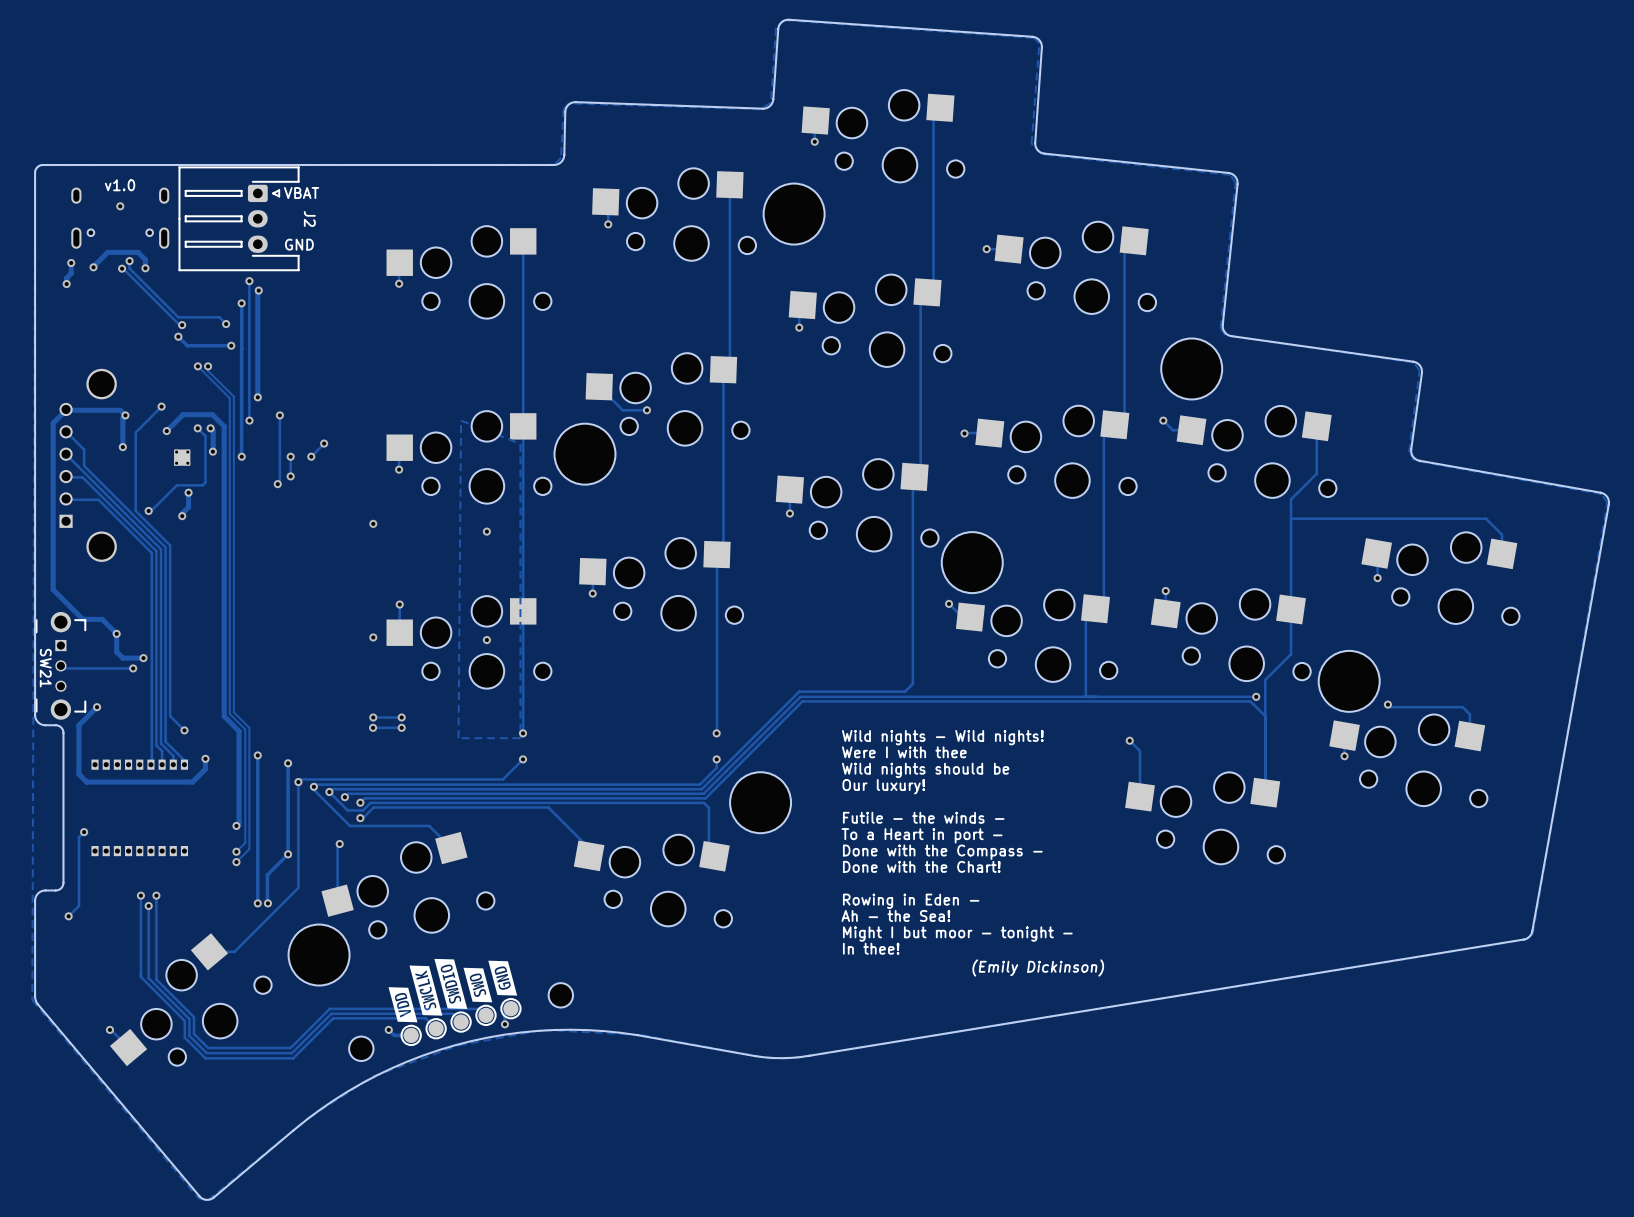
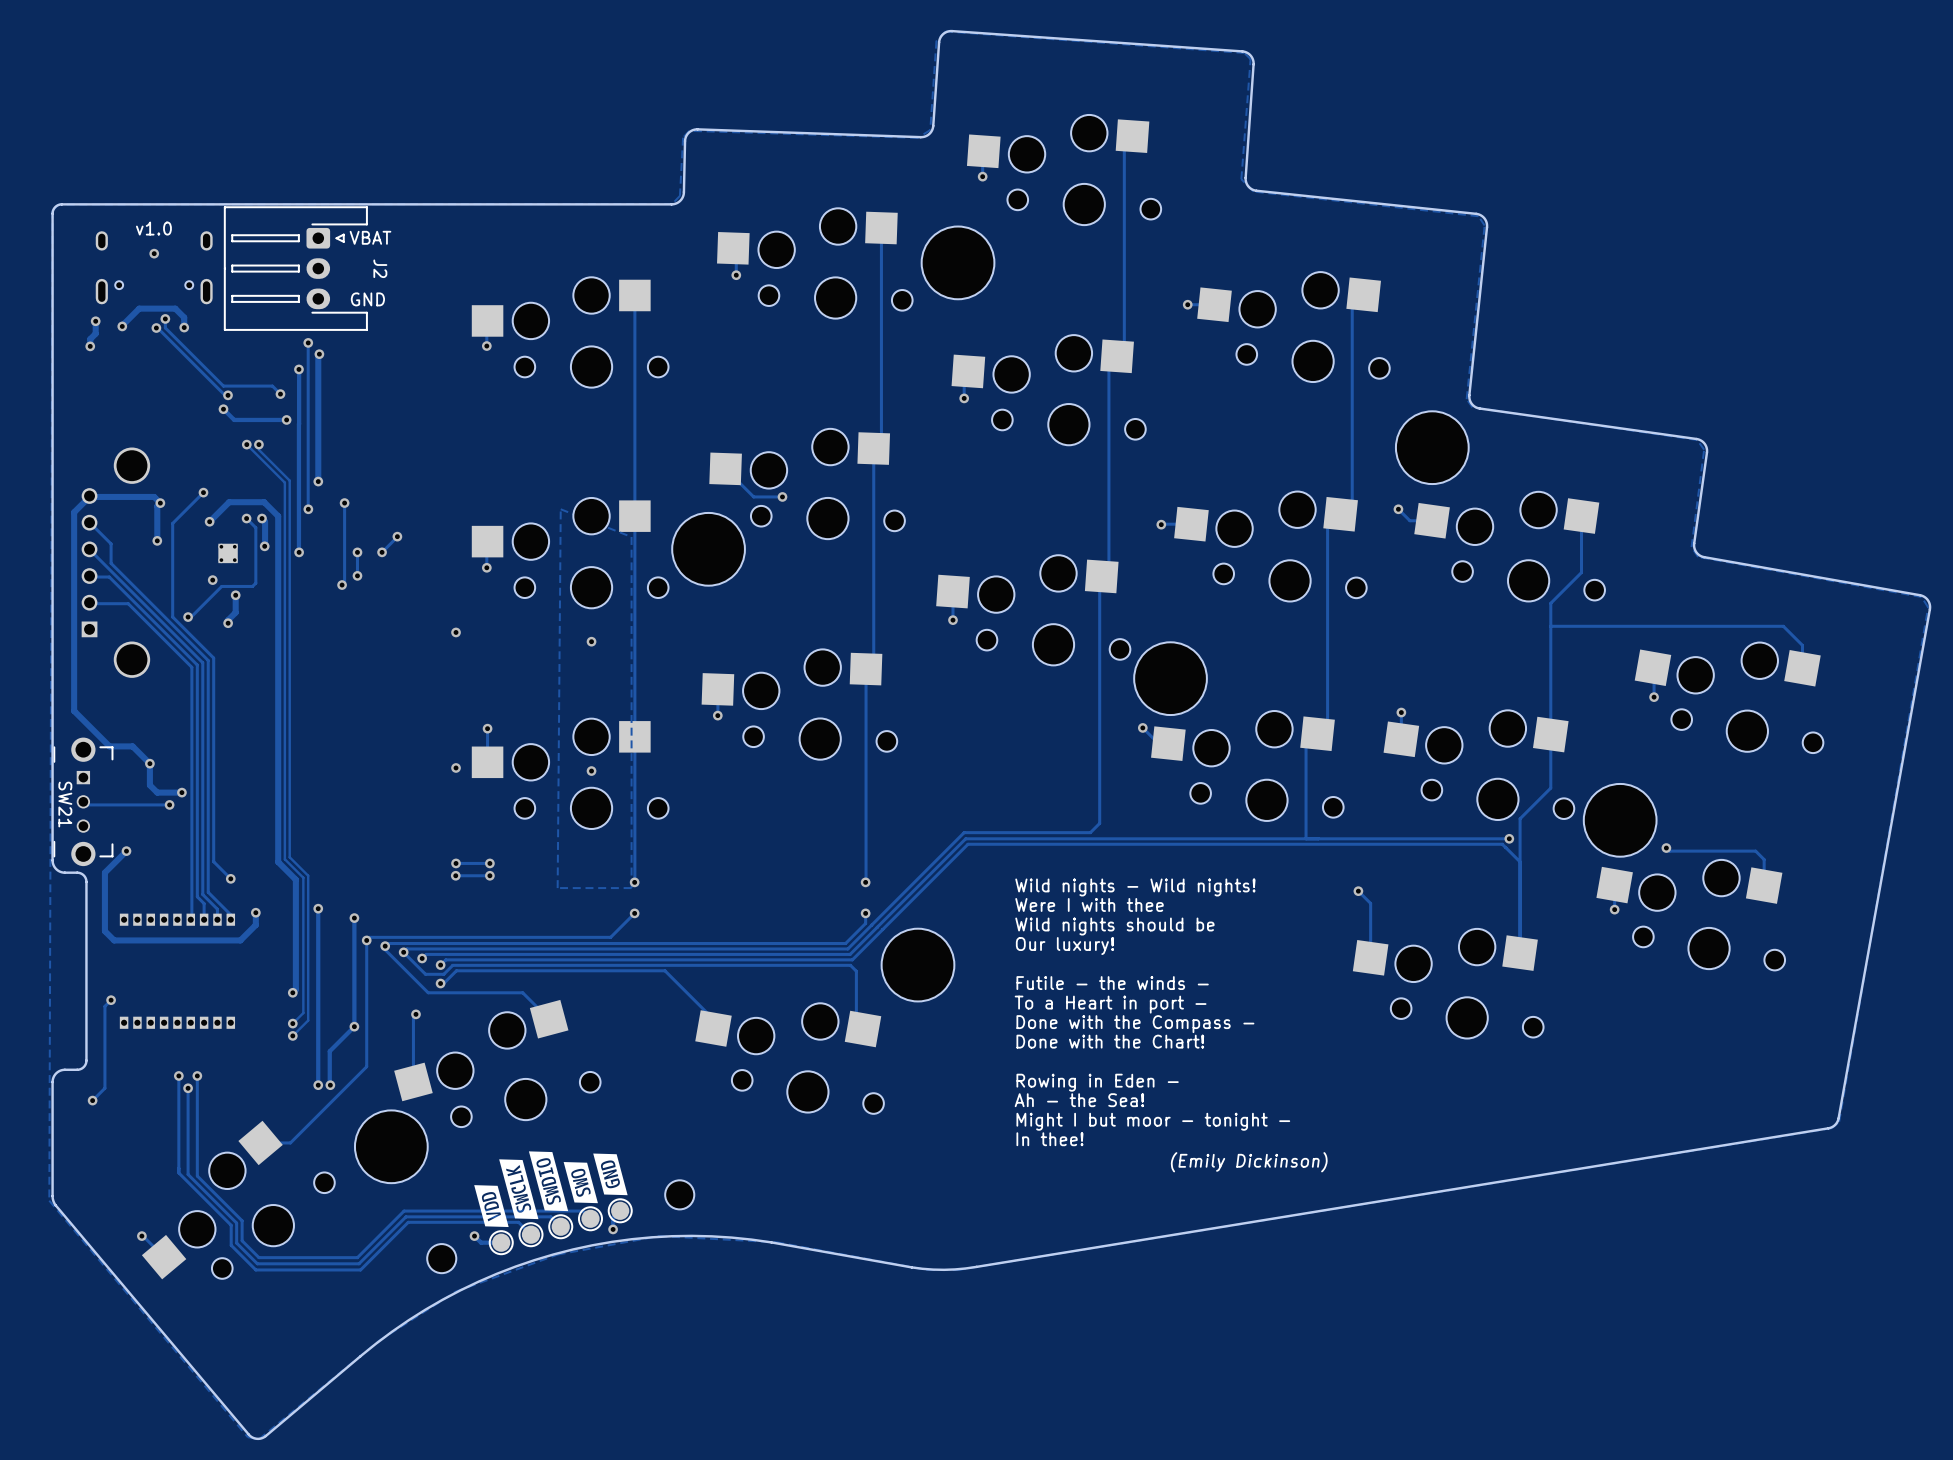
via: none -> (212, 580)

